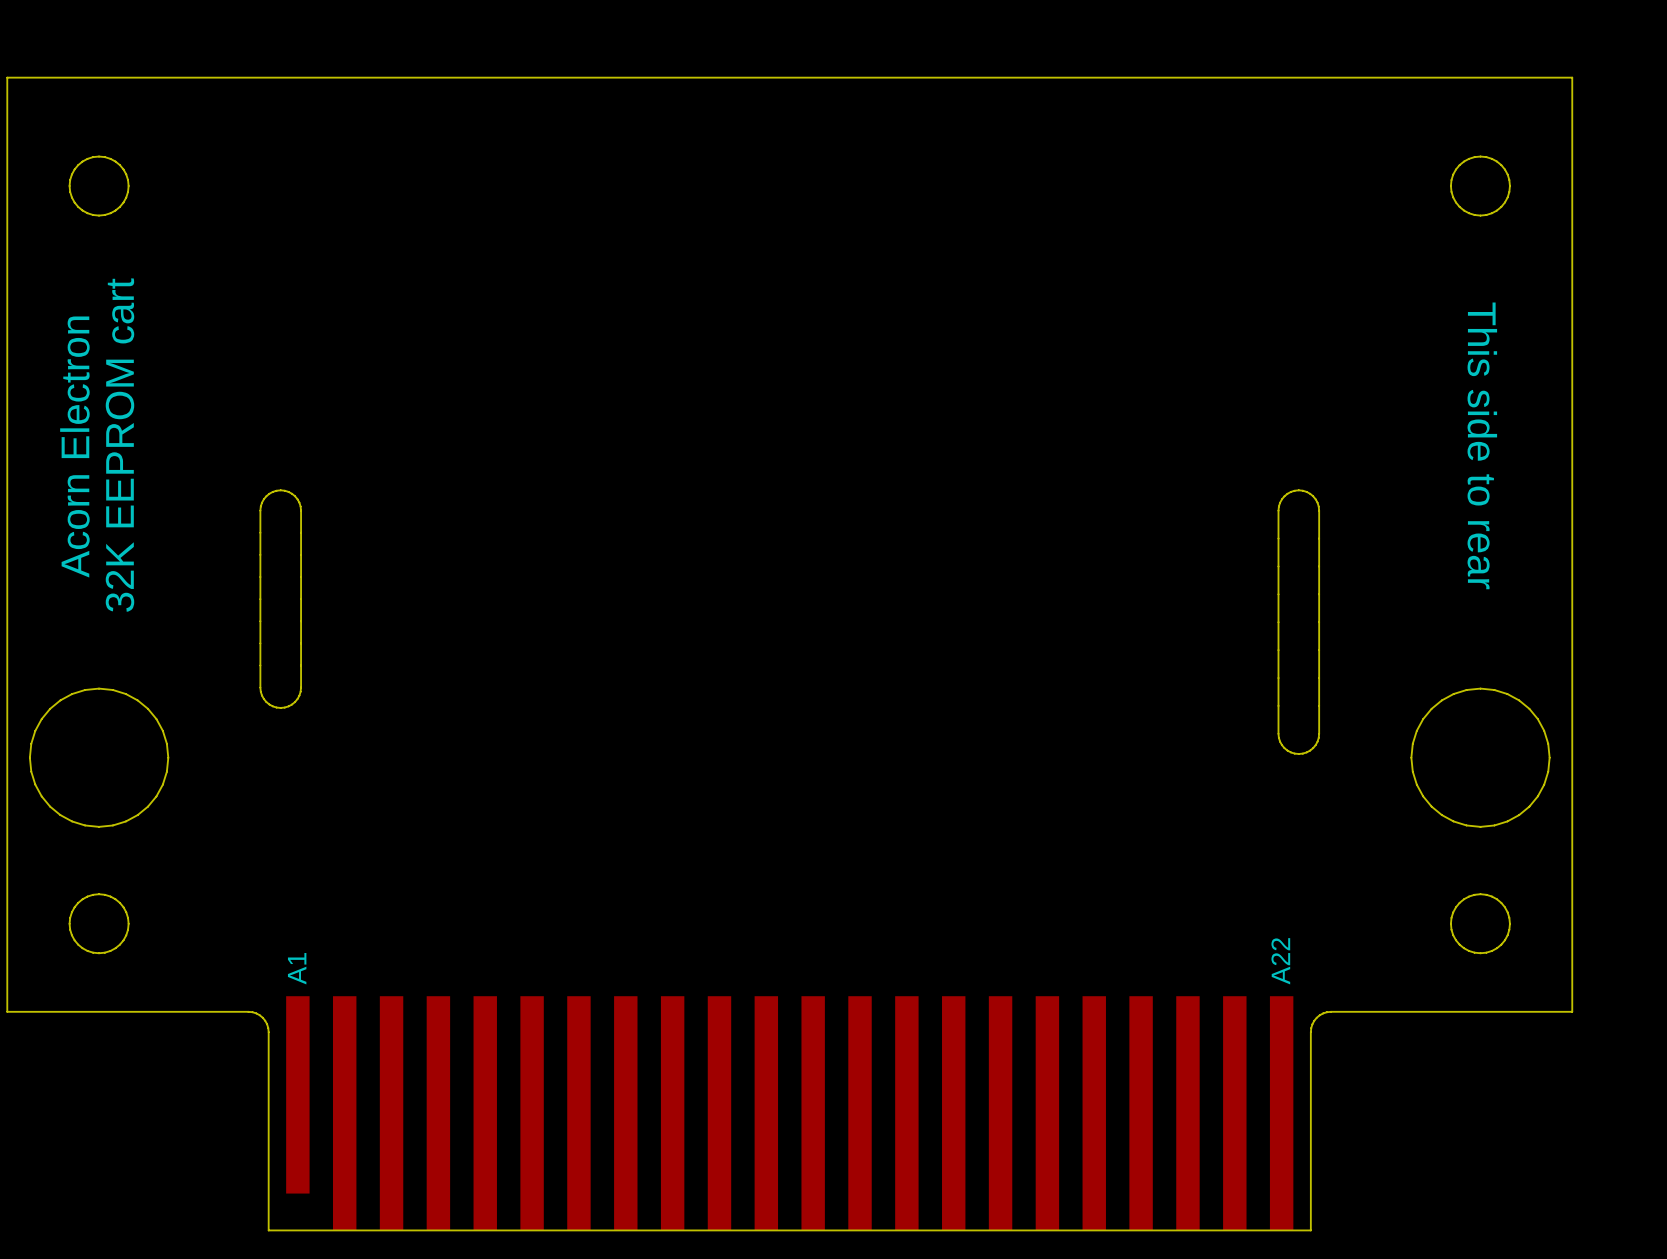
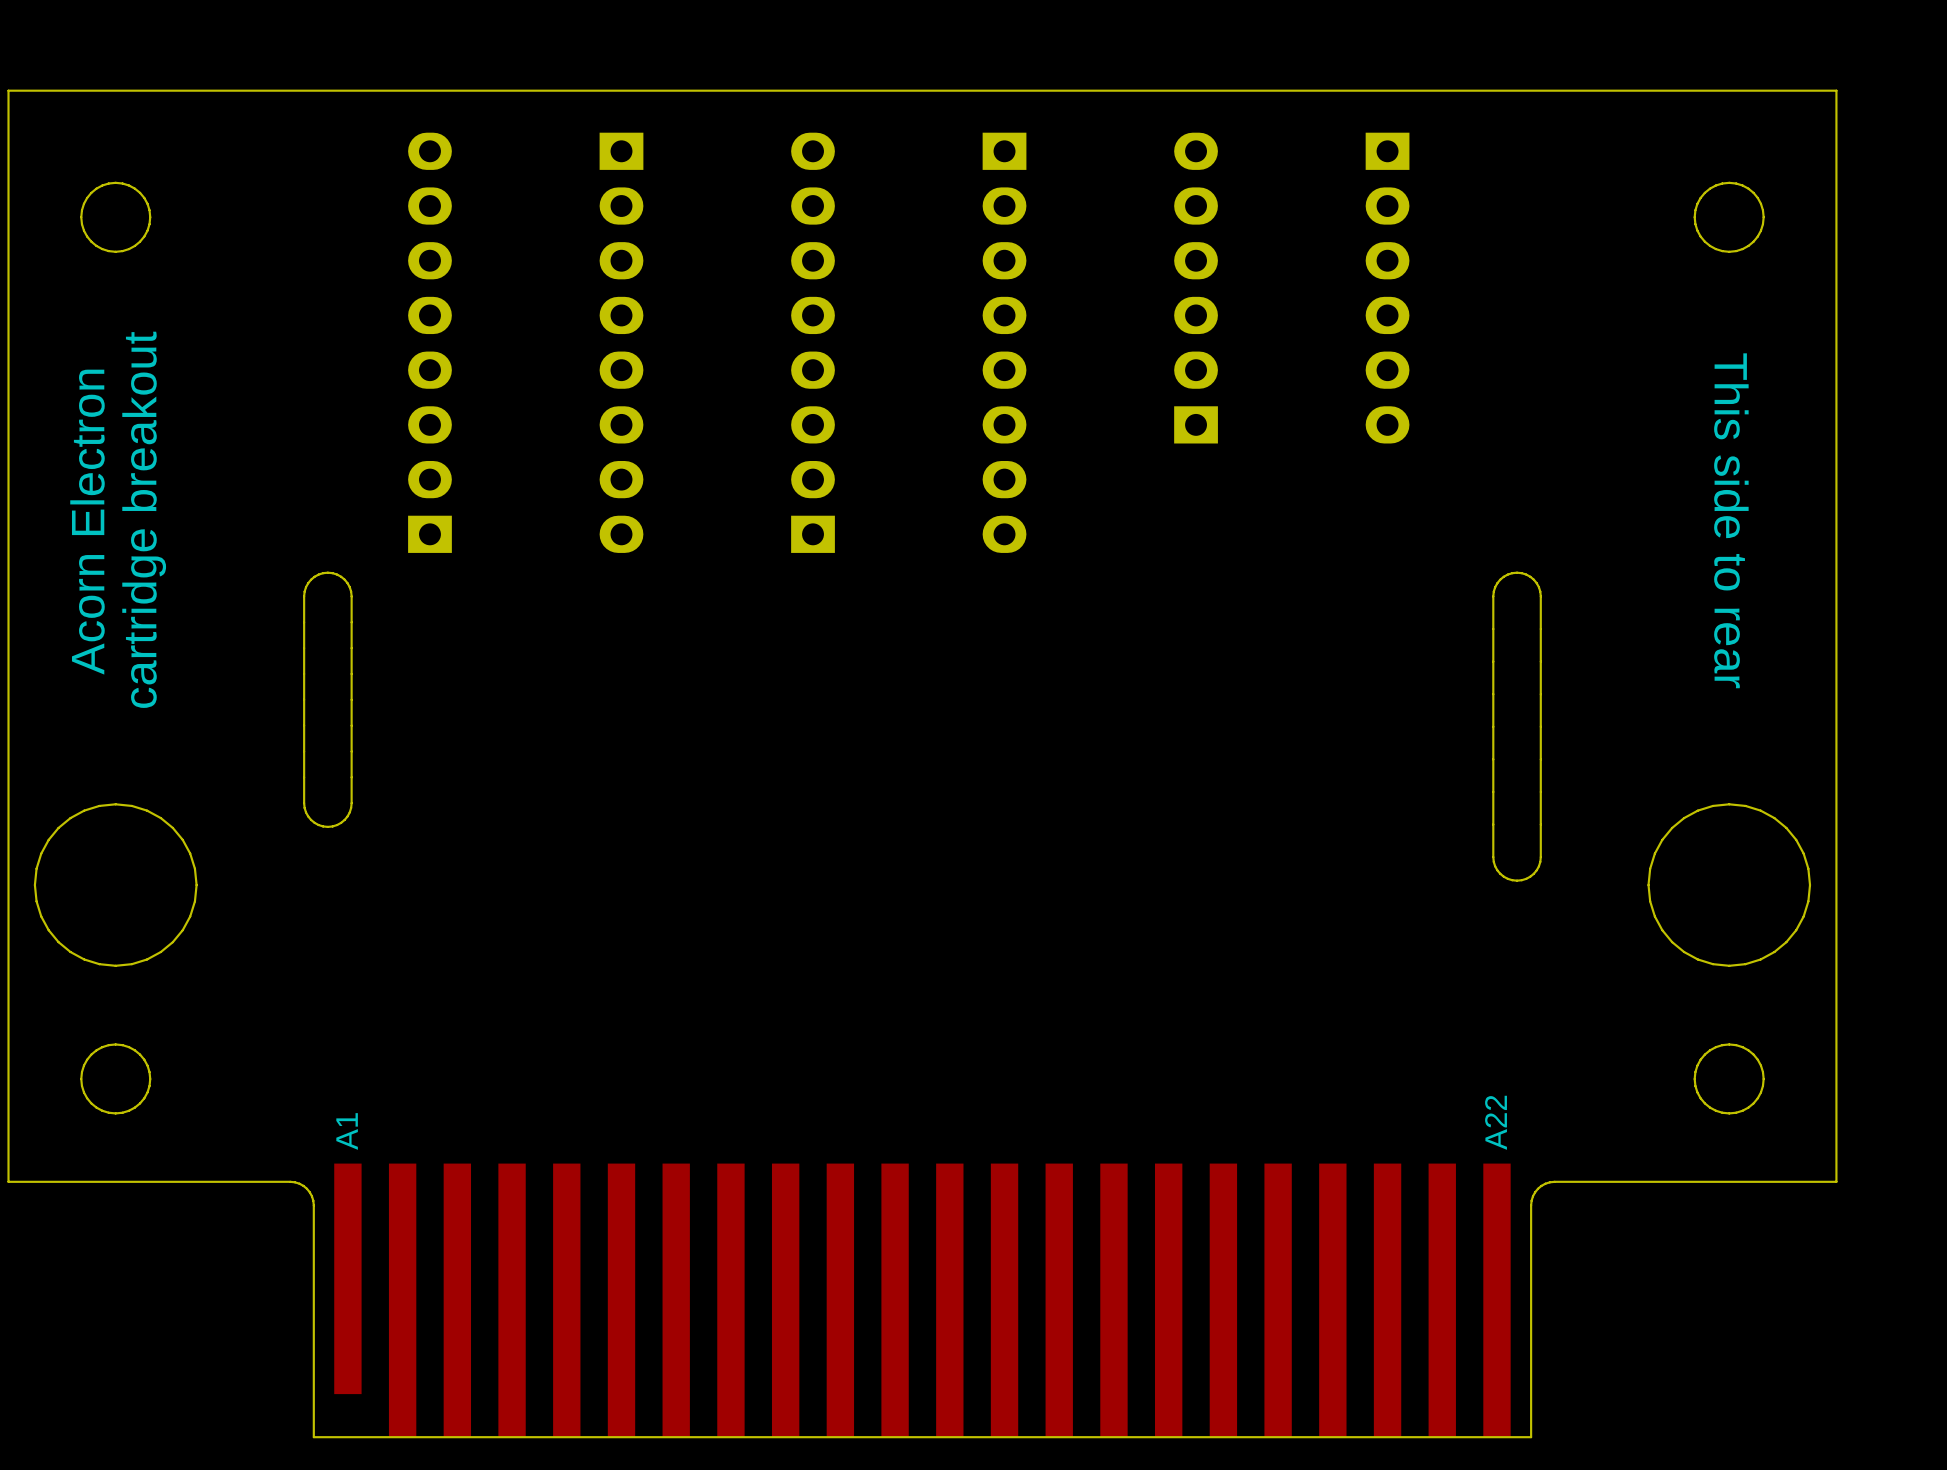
part: none -> (1196, 288)
part: none -> (1387, 288)
part: none -> (429, 342)
part: none -> (621, 342)
part: none -> (813, 342)
part: none -> (1004, 342)
text: 32K EEPROM cart (119, 445) -> cartridge breakout (144, 519)

